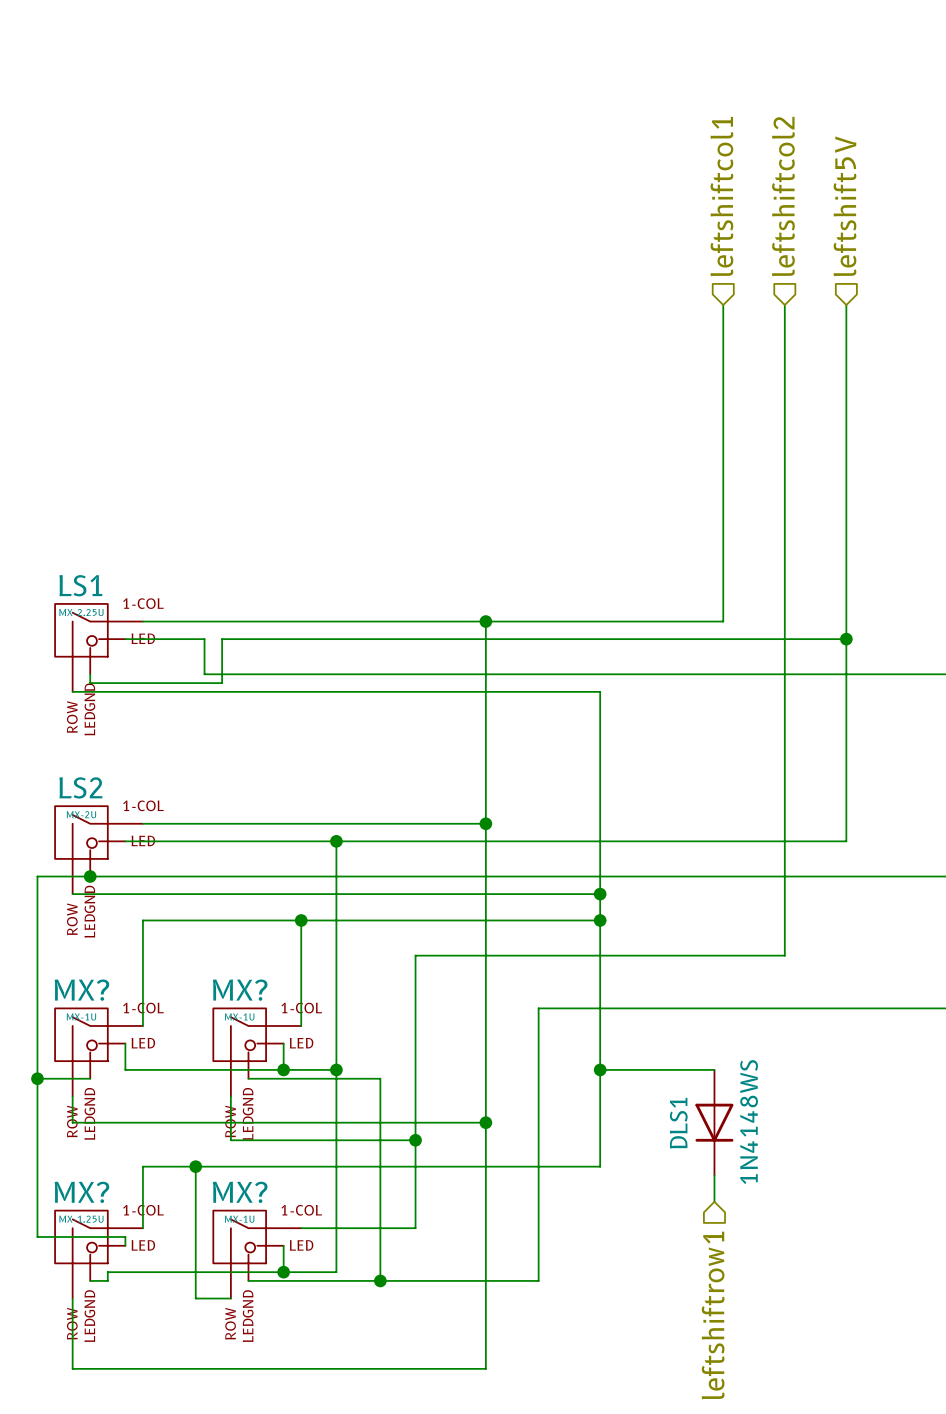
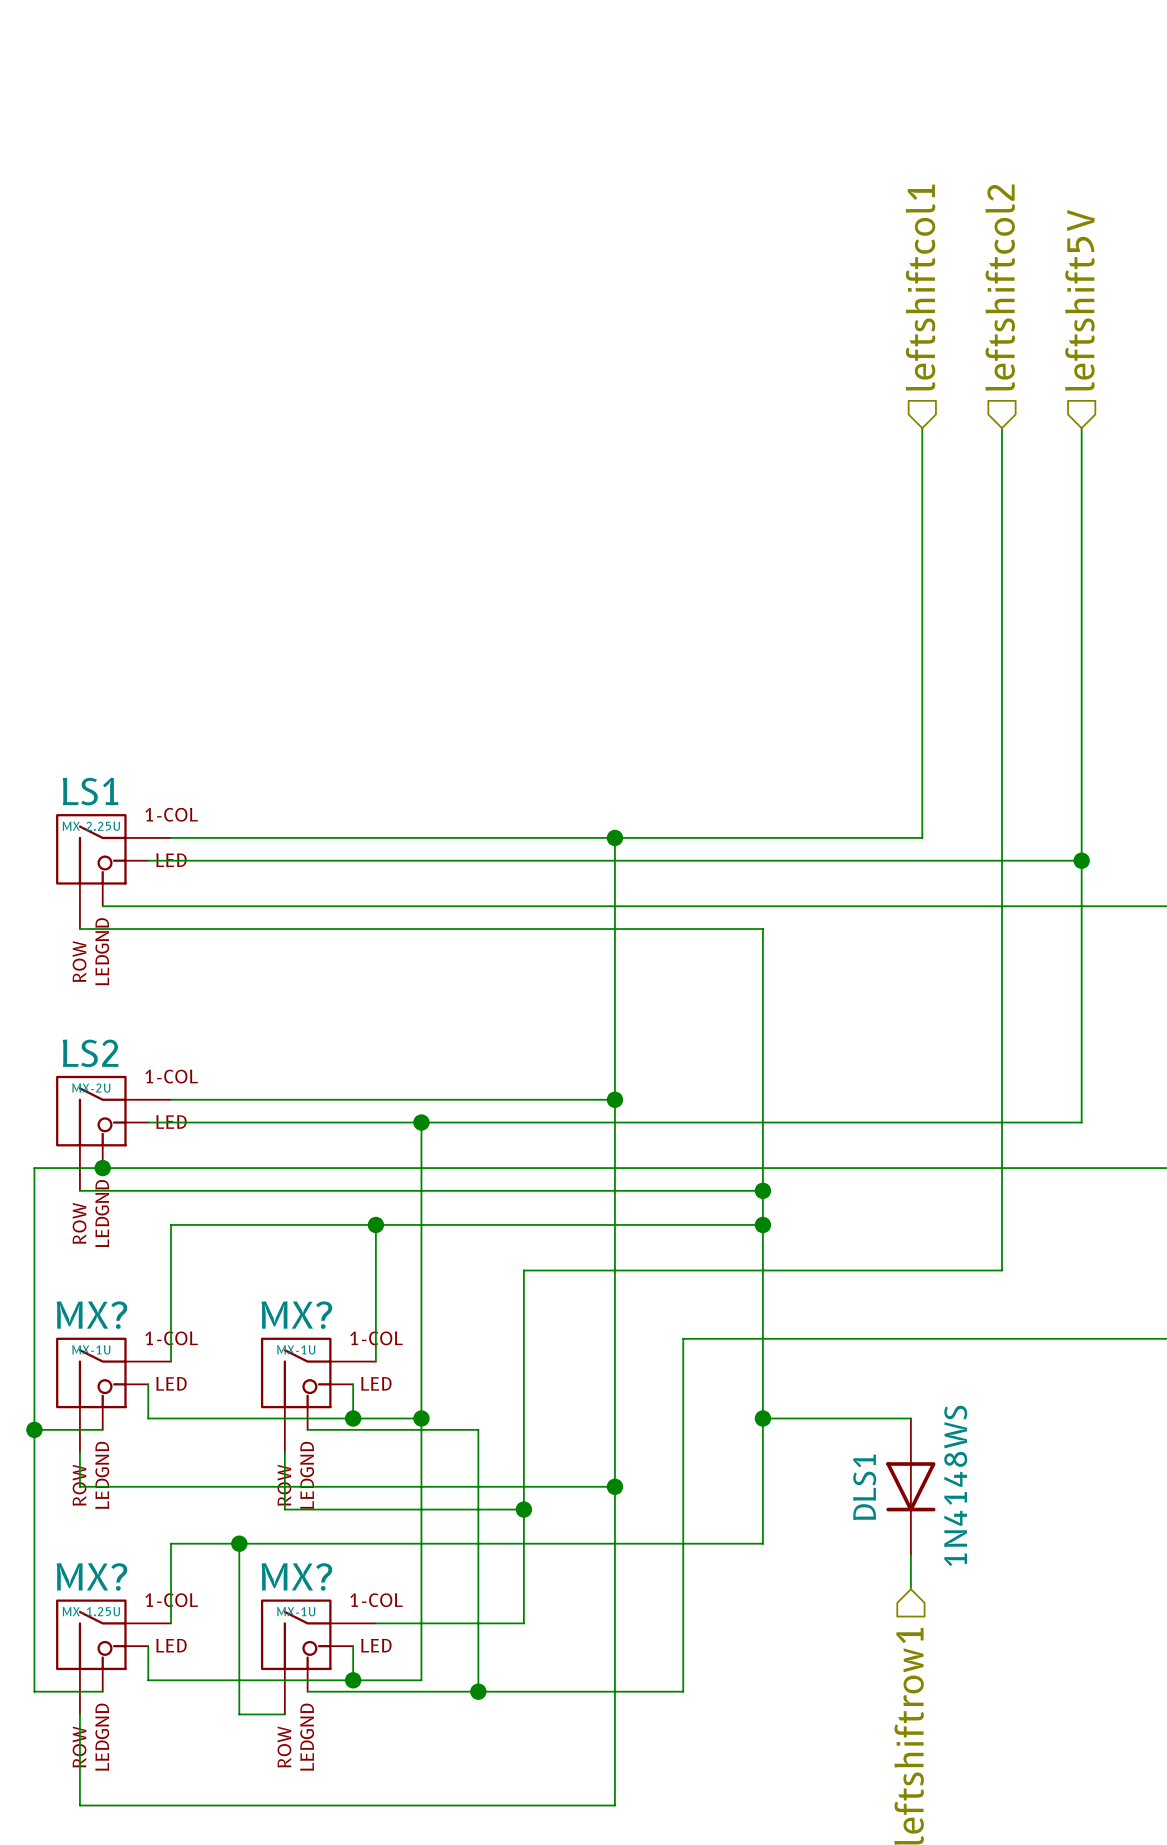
wire: (204, 639) (204, 674) -> (250, 860) (273, 860)
wire: (222, 639) (222, 683) (90, 683) (90, 674) -> (250, 906) (102, 906)
wire: (37, 1236) (125, 1236) (125, 1245) -> (34, 1634) (34, 1691) (102, 1691)
wire: (125, 1272) (107, 1272) (107, 1280) (90, 1280) -> (148, 1680) (148, 1646)

